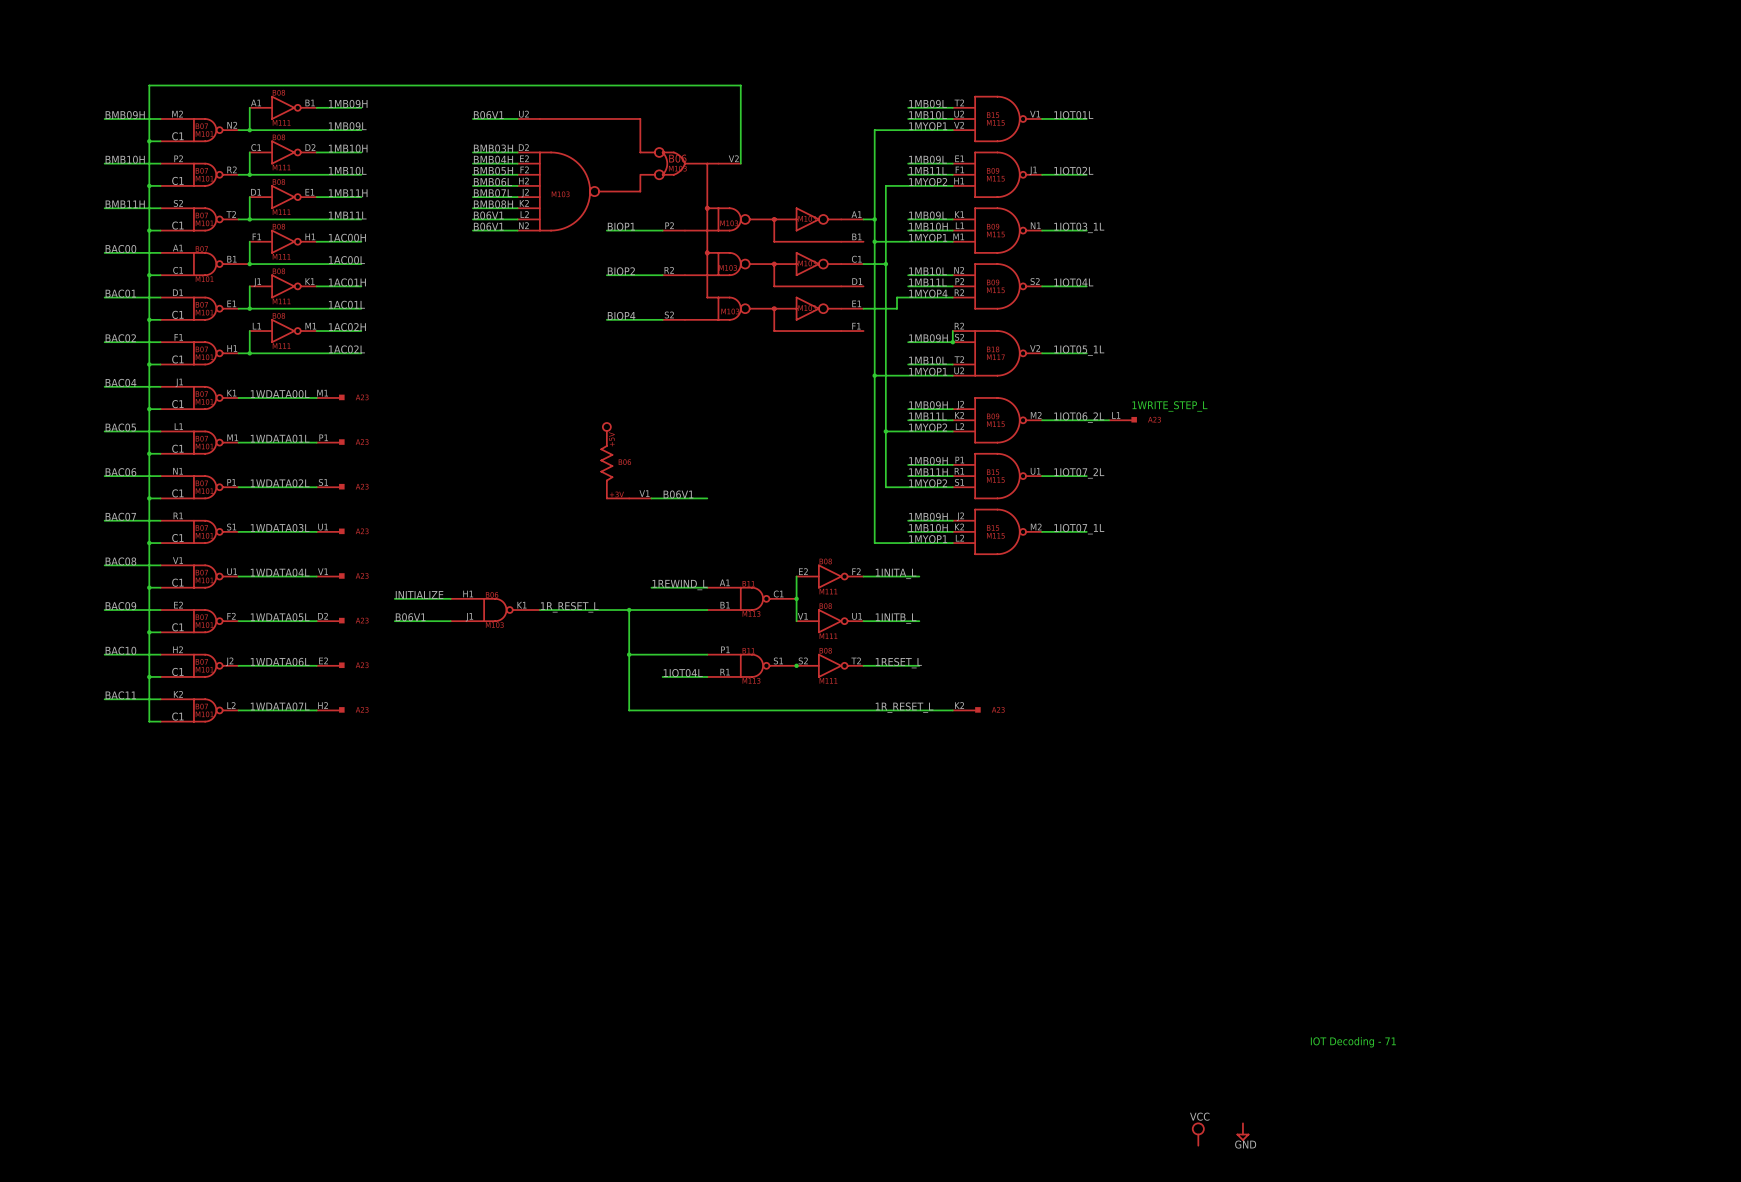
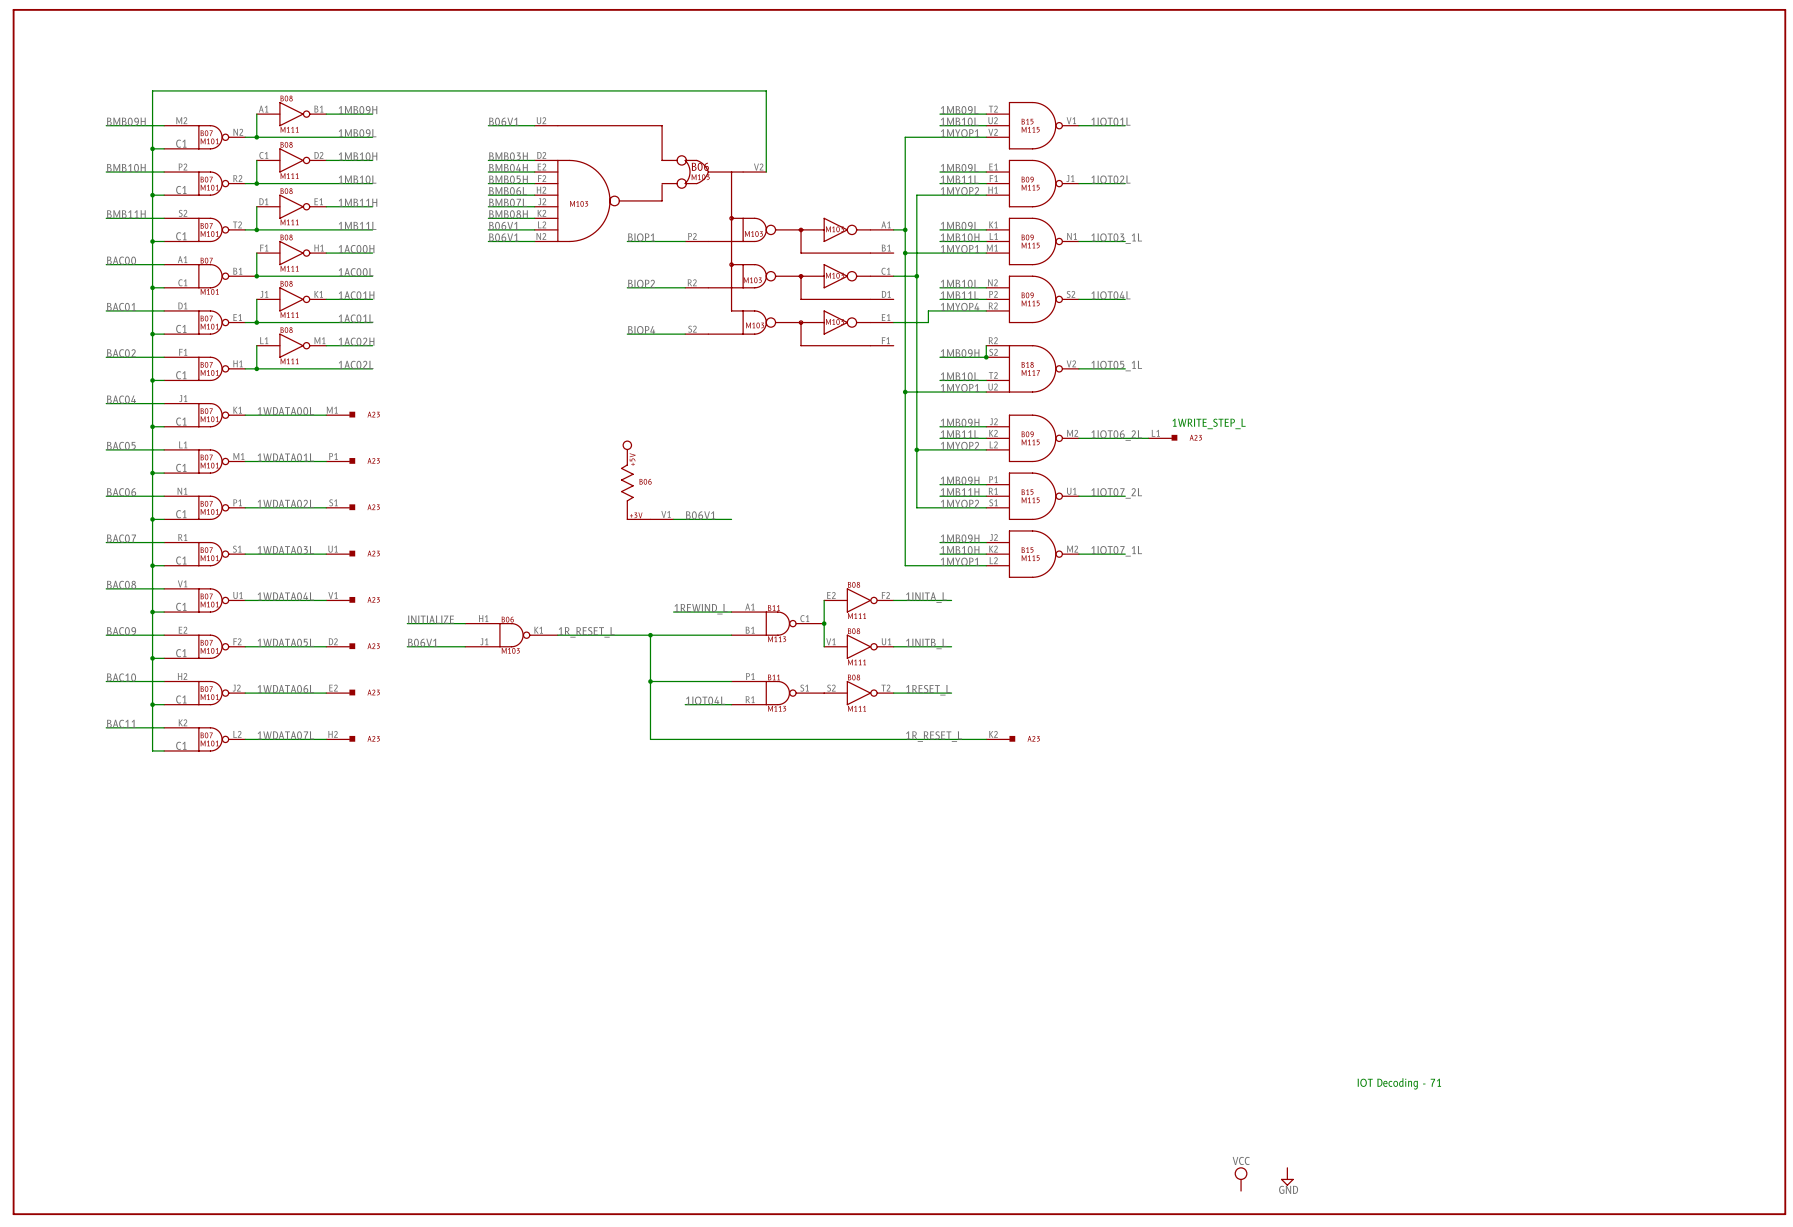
part: none -> (899, 612)
junction: (796, 665) -> none

